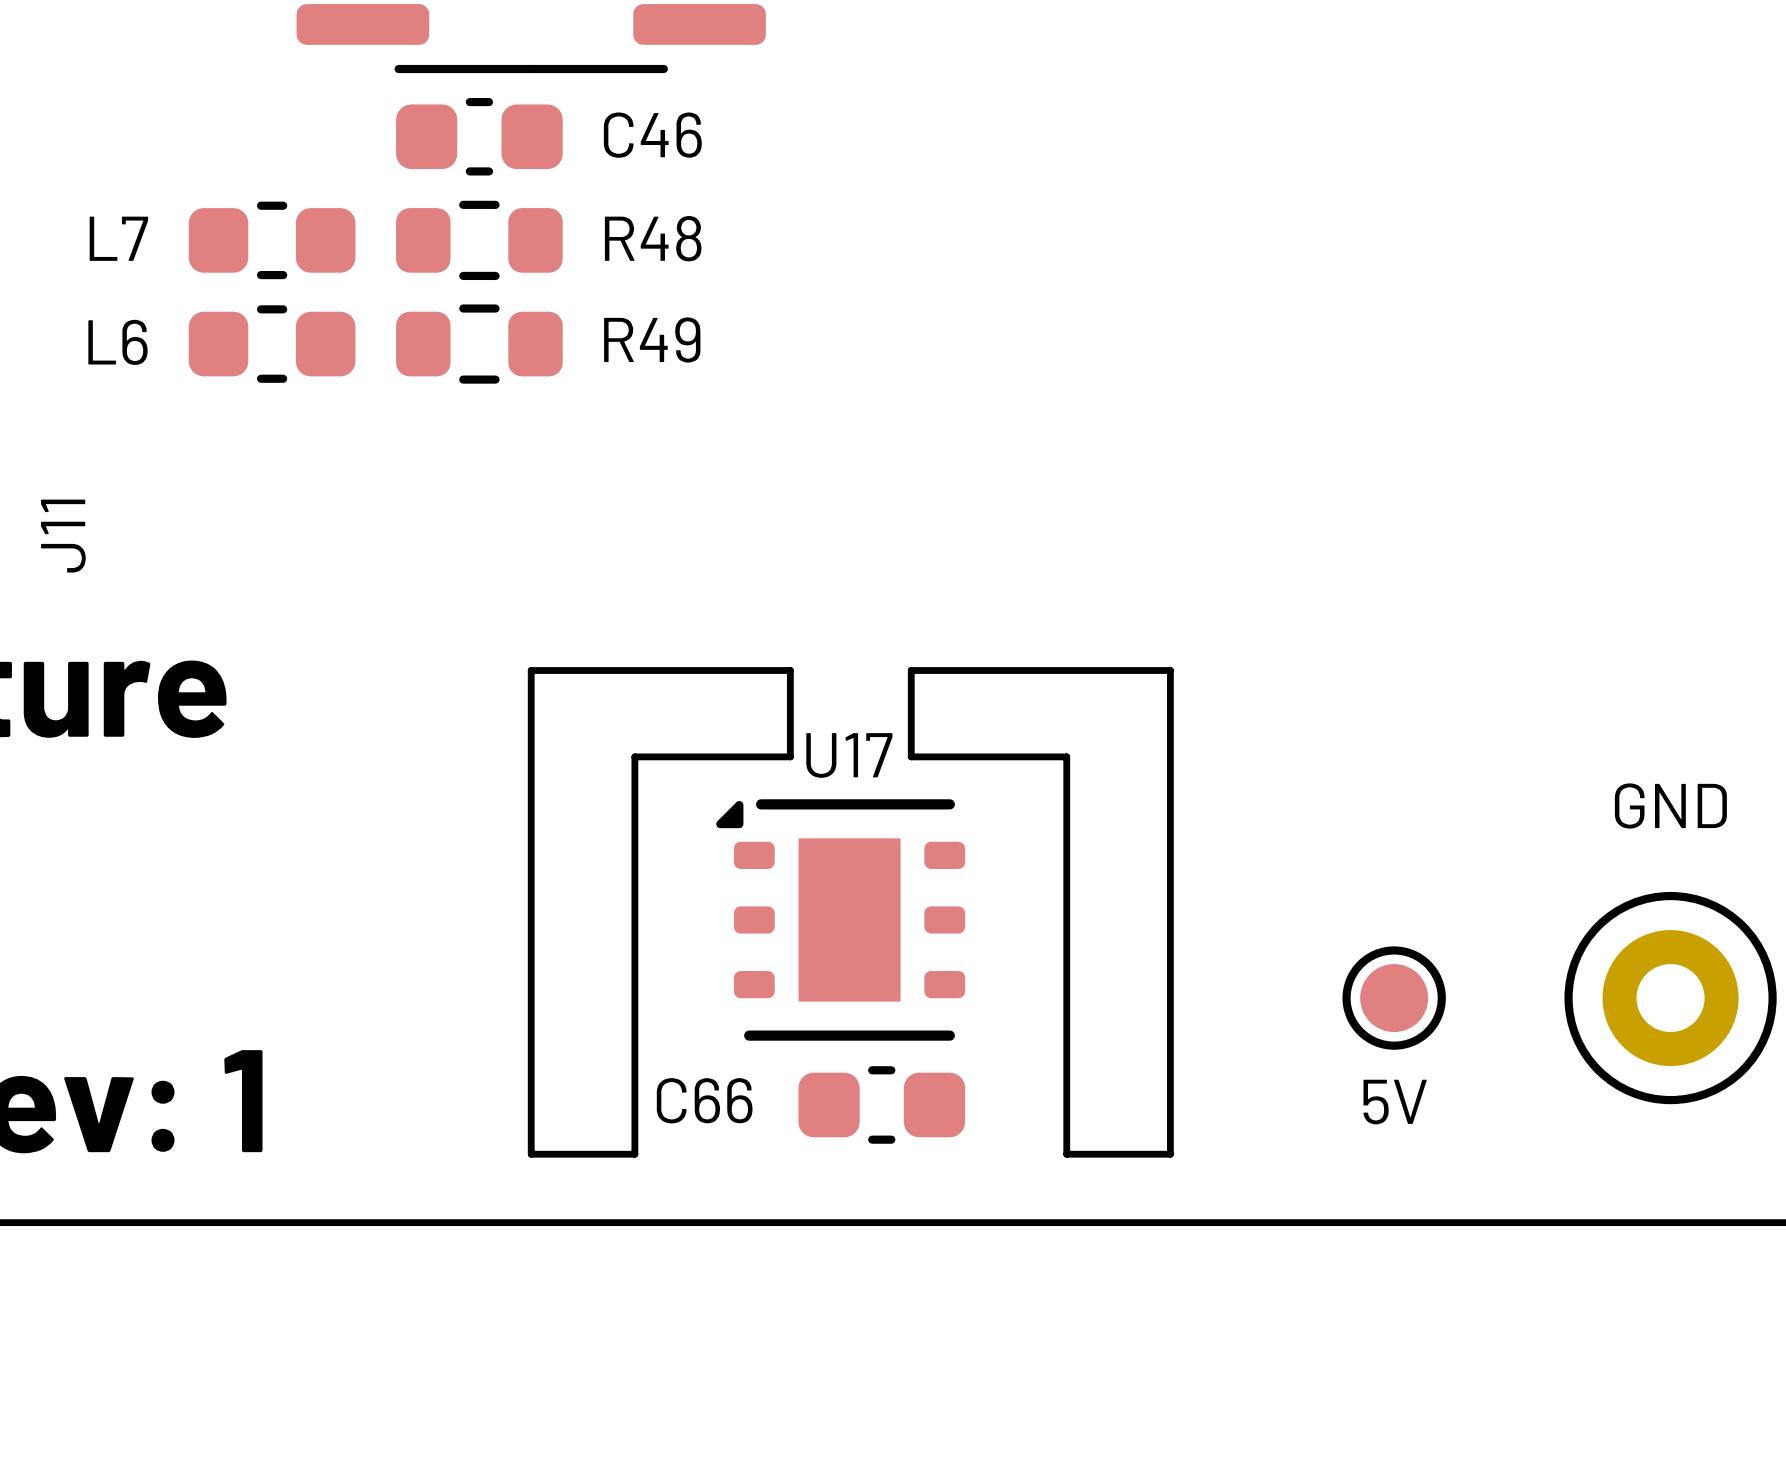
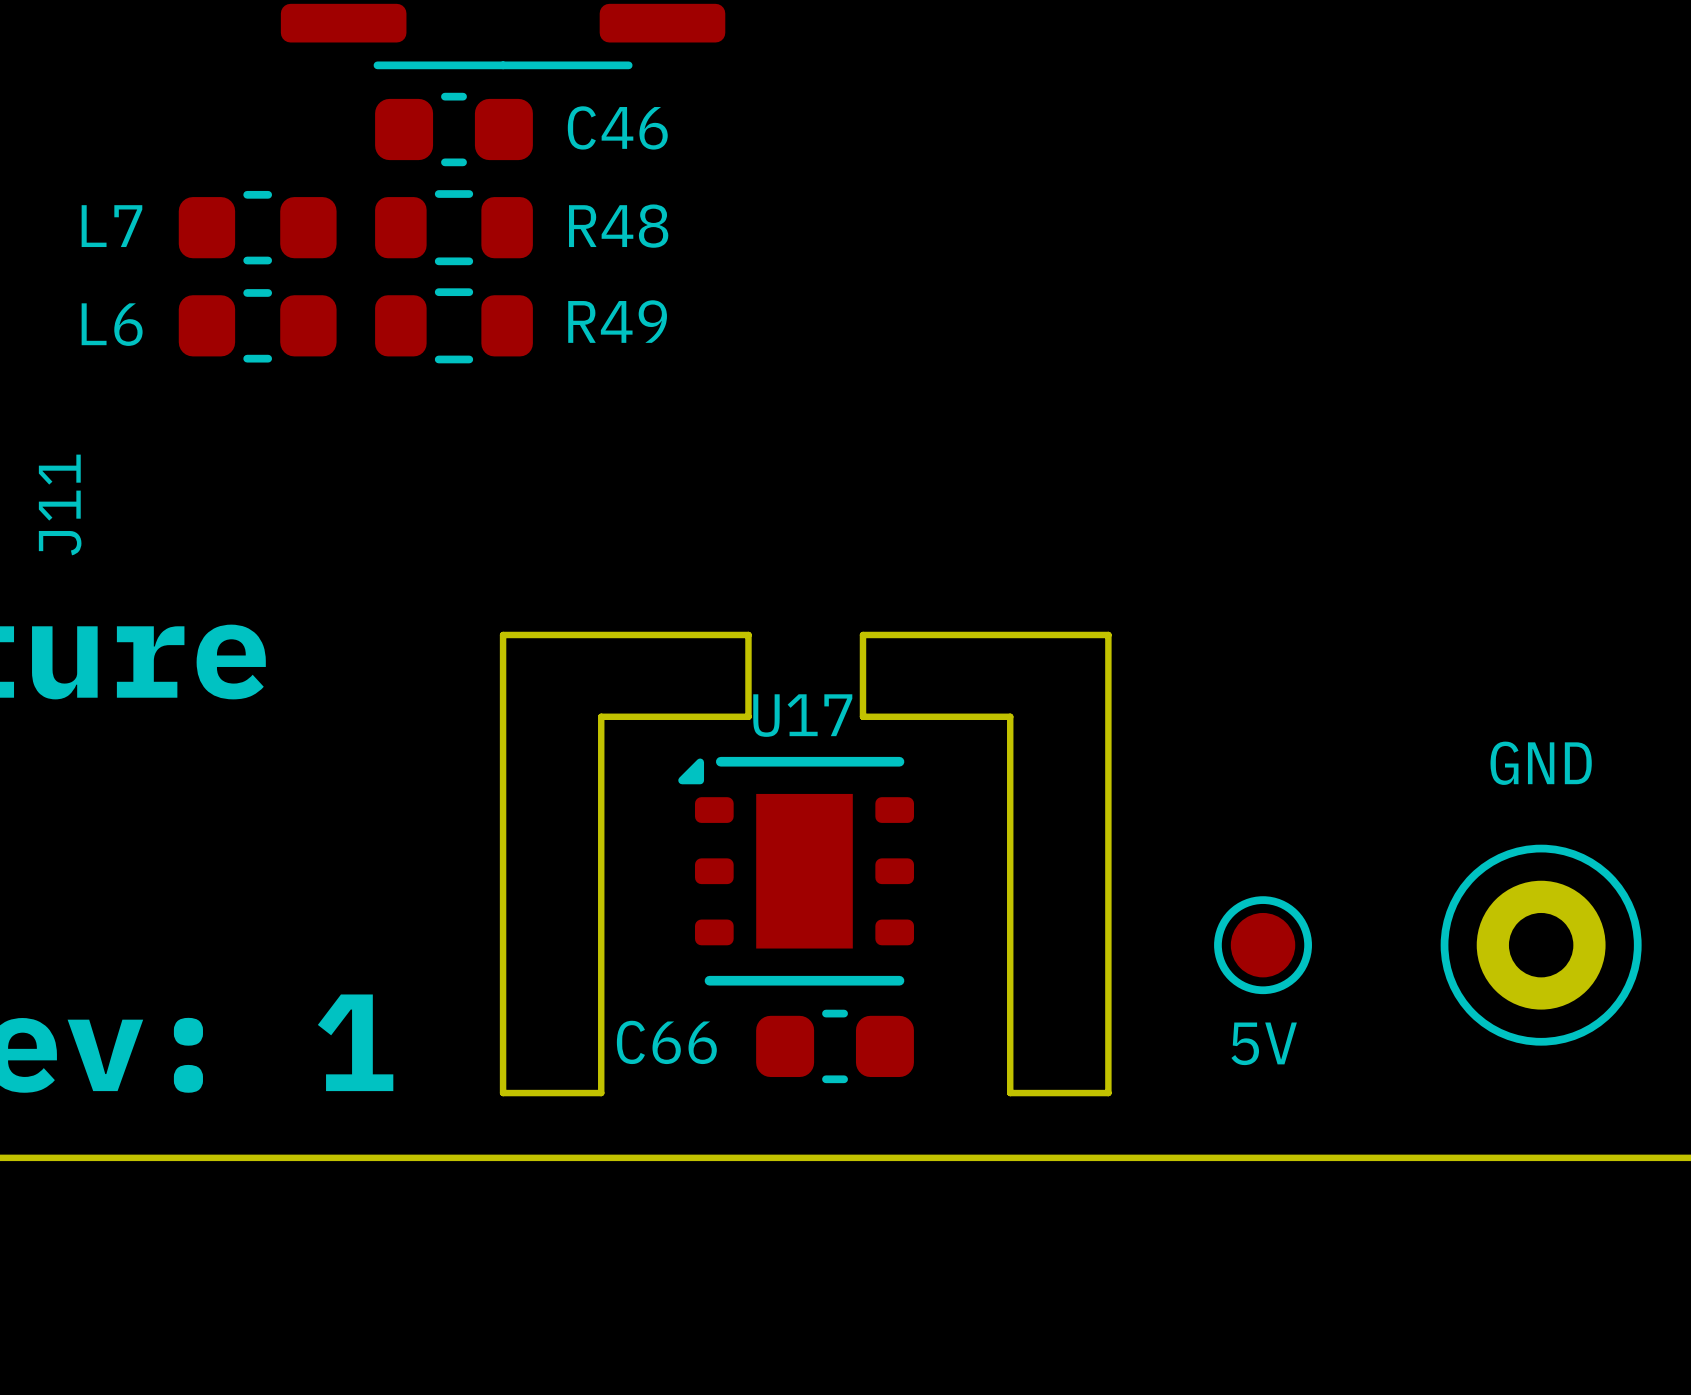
part position: (1394, 998) -> (1263, 945)
part position: (1670, 998) -> (1541, 945)

